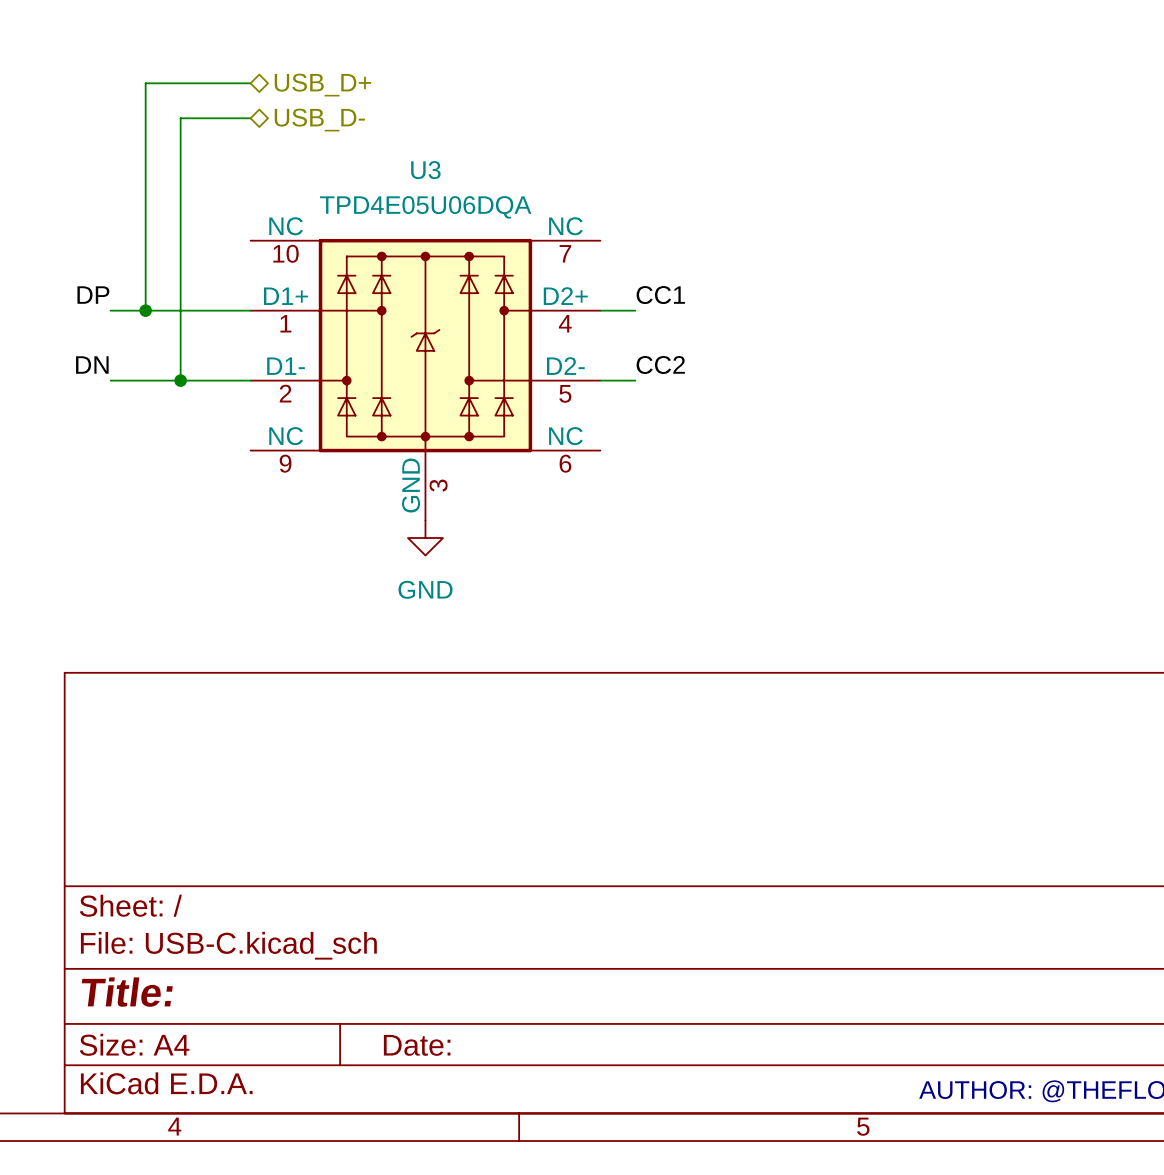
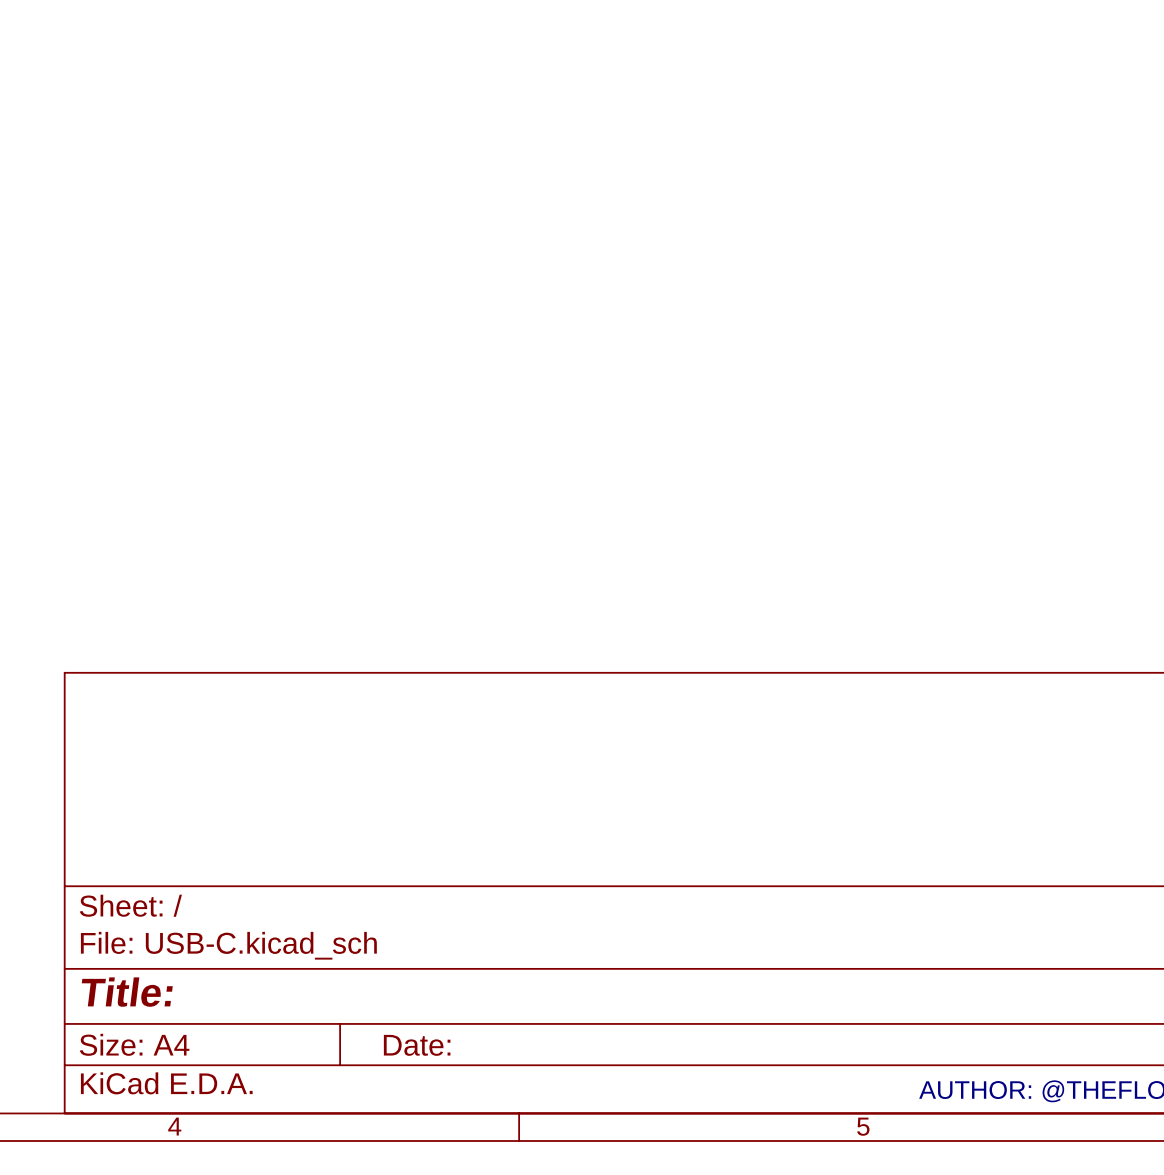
wire: (250, 83) (145, 83) (145, 310) -> none
hierarchical label: USB_D+ (322, 85) -> none
wire: (250, 118) (180, 118) (180, 380) -> none
hierarchical label: USB_D- (319, 120) -> none
label: DP (93, 295) -> none
label: CC1 (660, 295) -> none
wire: (110, 310) (250, 310) -> none
junction: (145, 310) -> none
wire: (600, 310) (635, 310) -> none
label: DN (92, 365) -> none
label: CC2 (660, 365) -> none
U3: TPD4E05U06DQA (425, 379) -> none
wire: (110, 380) (250, 380) -> none
junction: (180, 380) -> none
wire: (600, 380) (635, 380) -> none
power symbol: GND (425, 538) -> none

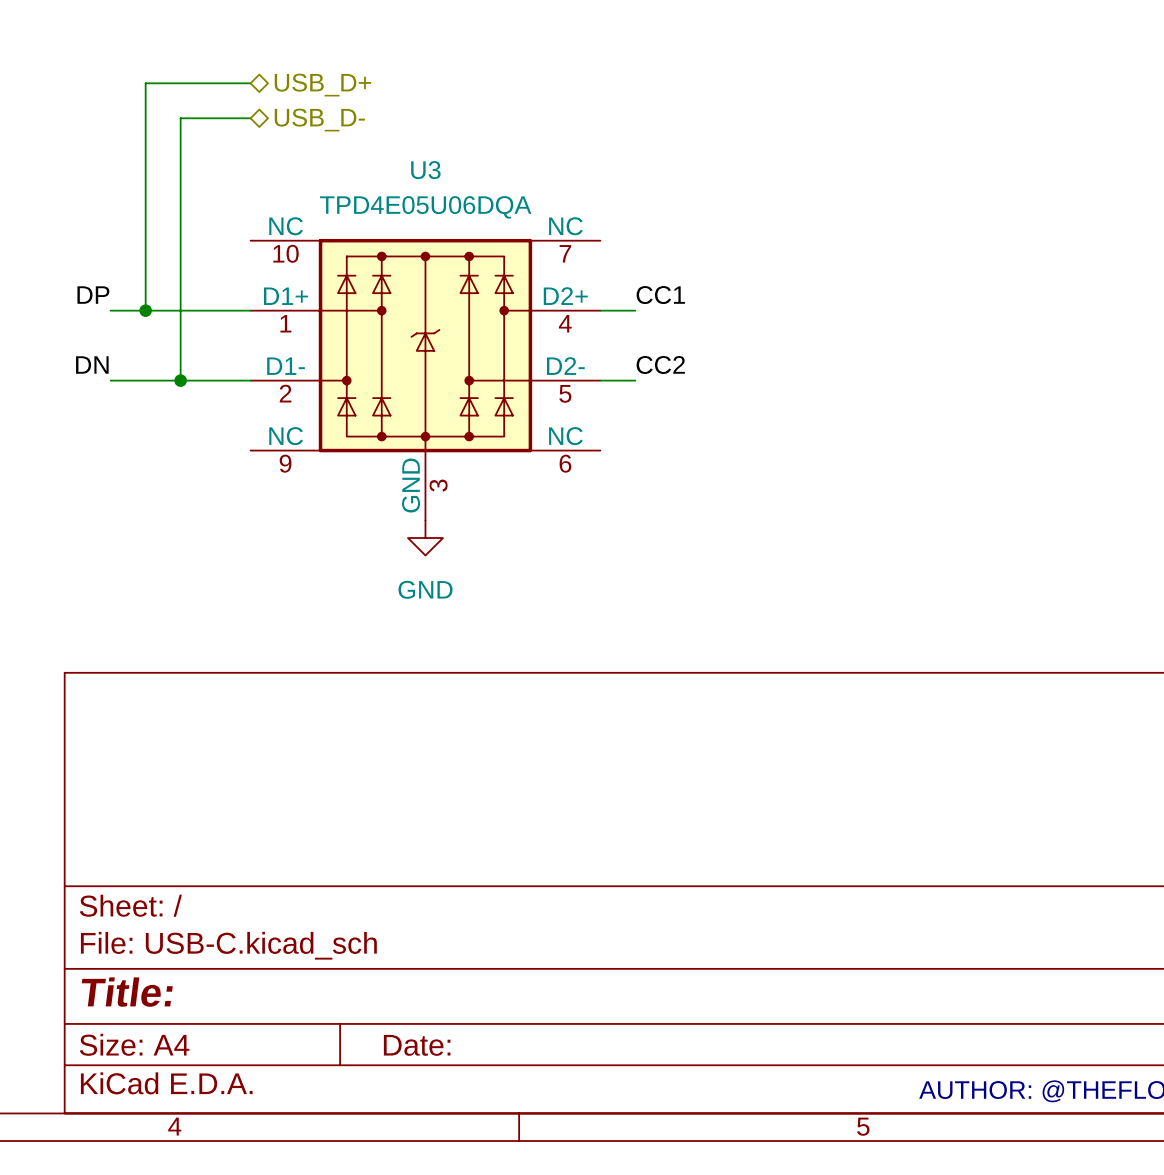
wire: none -> (250, 83) (145, 83) (145, 310)
hierarchical label: none -> USB_D+ (322, 85)
wire: none -> (250, 118) (180, 118) (180, 380)
hierarchical label: none -> USB_D- (319, 120)
label: none -> DP (93, 295)
label: none -> CC1 (660, 295)
wire: none -> (110, 310) (250, 310)
junction: none -> (145, 310)
wire: none -> (600, 310) (635, 310)
label: none -> DN (92, 365)
label: none -> CC2 (660, 365)
U3: none -> TPD4E05U06DQA (425, 379)
wire: none -> (110, 380) (250, 380)
junction: none -> (180, 380)
wire: none -> (600, 380) (635, 380)
power symbol: none -> GND (425, 538)

